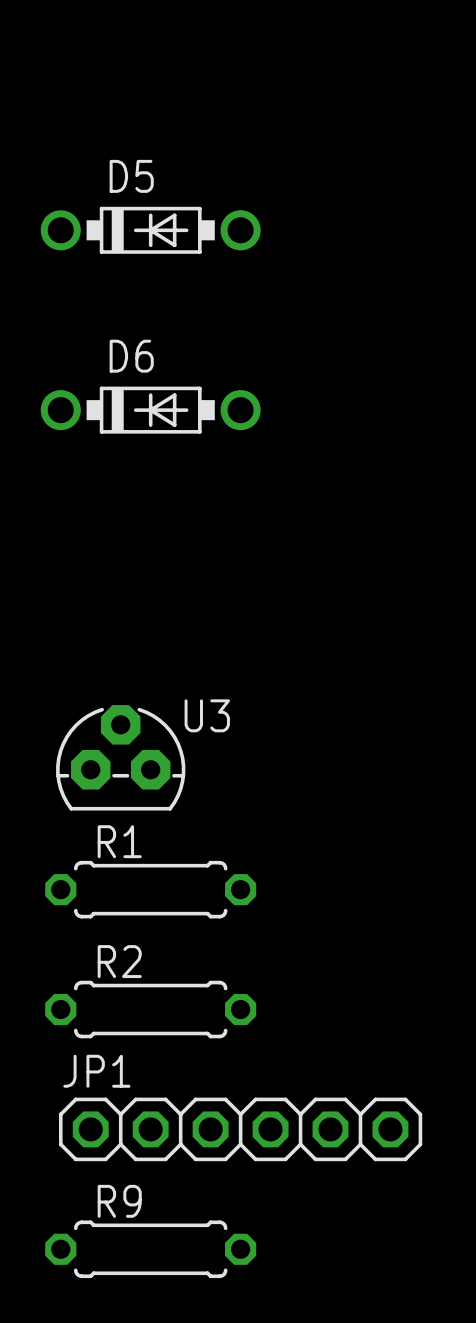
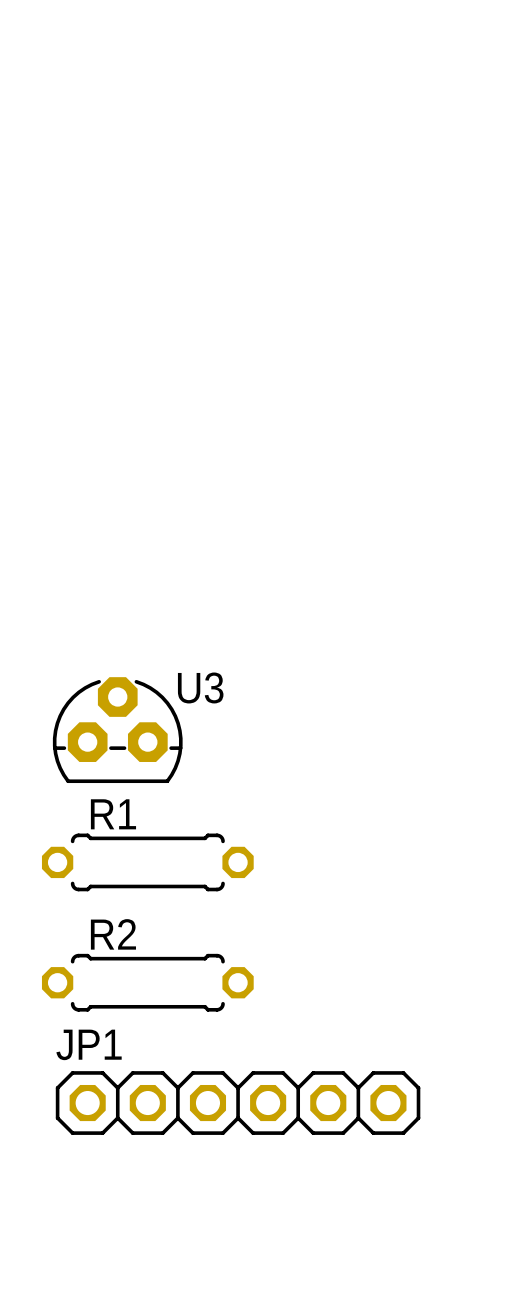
D5: (150, 230) -> none
D6: (150, 410) -> none
R9: (150, 1249) -> none

